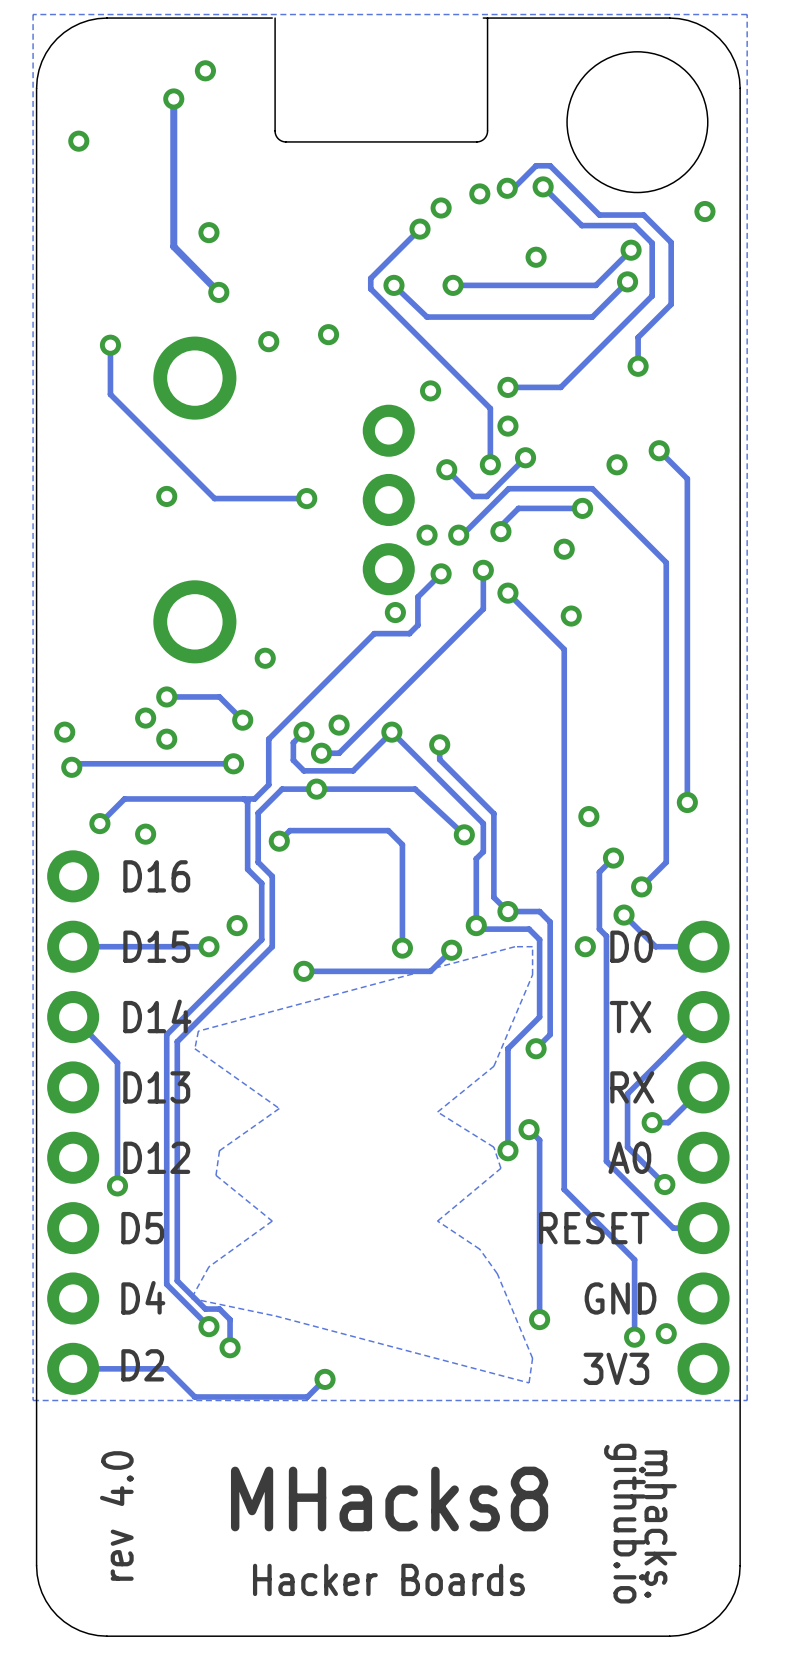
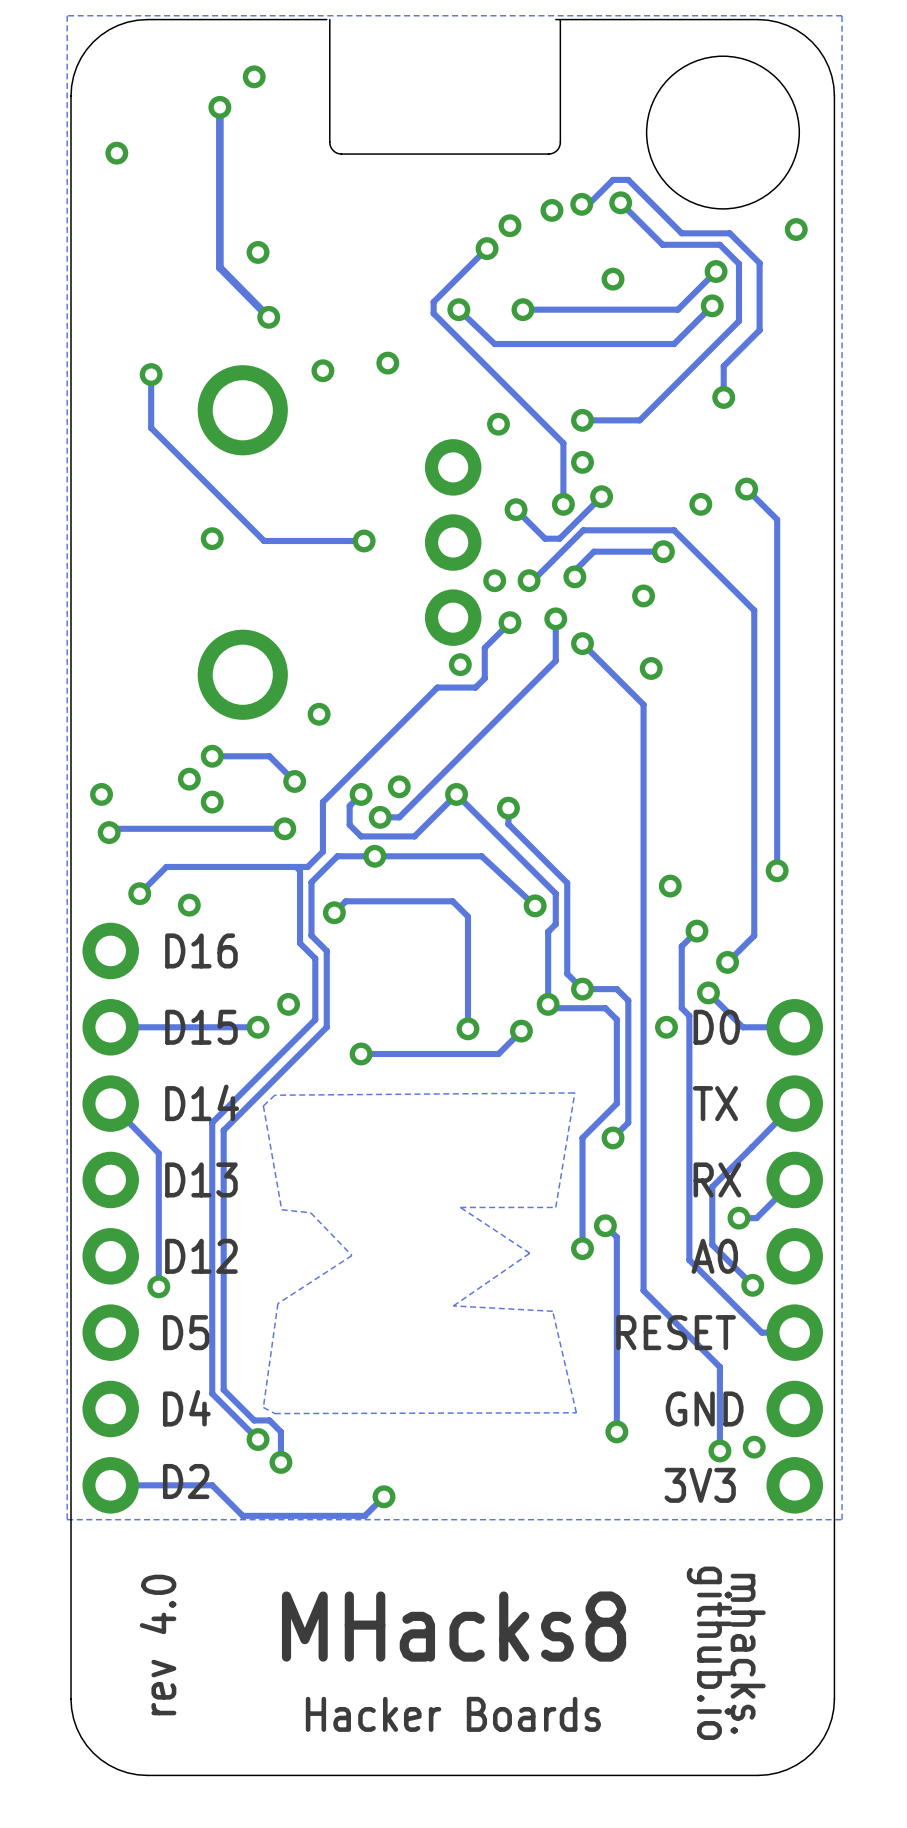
zone outline: (532, 946) (532, 974) (493, 1066) (437, 1112) (493, 1147) (500, 1168) (437, 1221) (479, 1249) (497, 1273) (532, 1358) (529, 1382) (275, 1316) (191, 1298) (208, 1266) (272, 1221) (215, 1175) (219, 1150) (279, 1108) (194, 1048) (198, 1031) (514, 946) (532, 946) -> (574, 1092) (274, 1095) (263, 1105) (281, 1209) (310, 1212) (351, 1255) (277, 1303) (263, 1407) (274, 1413) (576, 1412) (552, 1311) (453, 1305) (529, 1253) (460, 1207) (555, 1207) (574, 1092)

